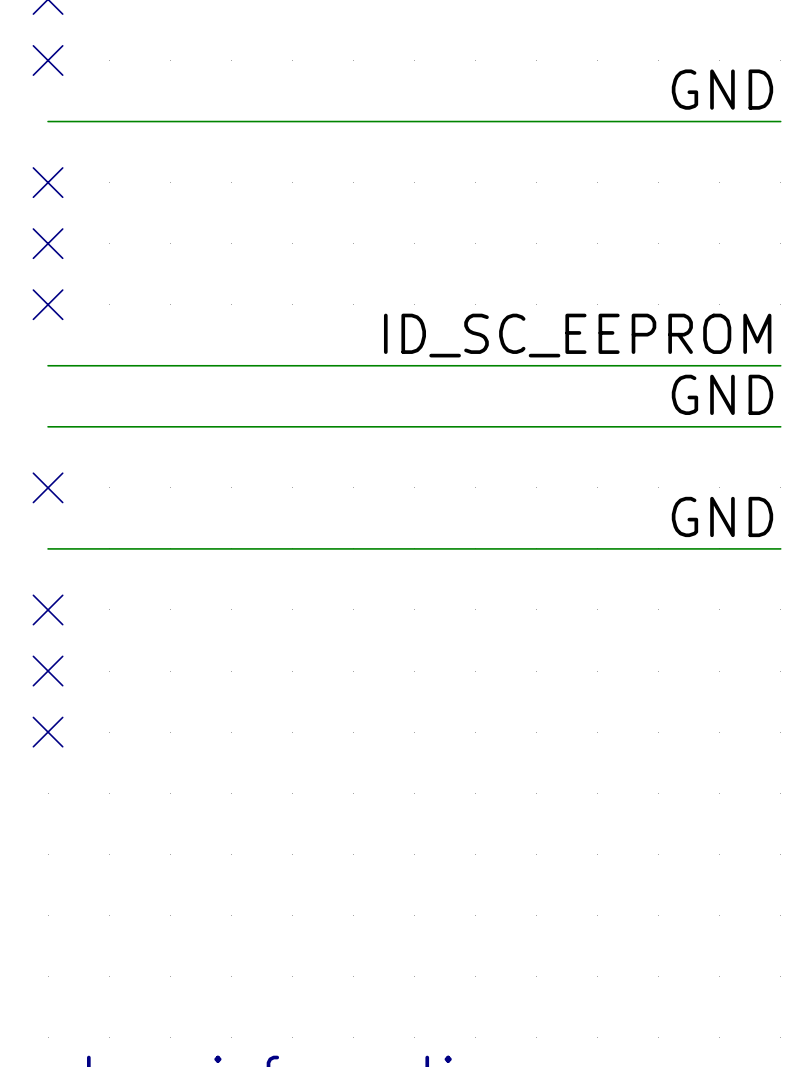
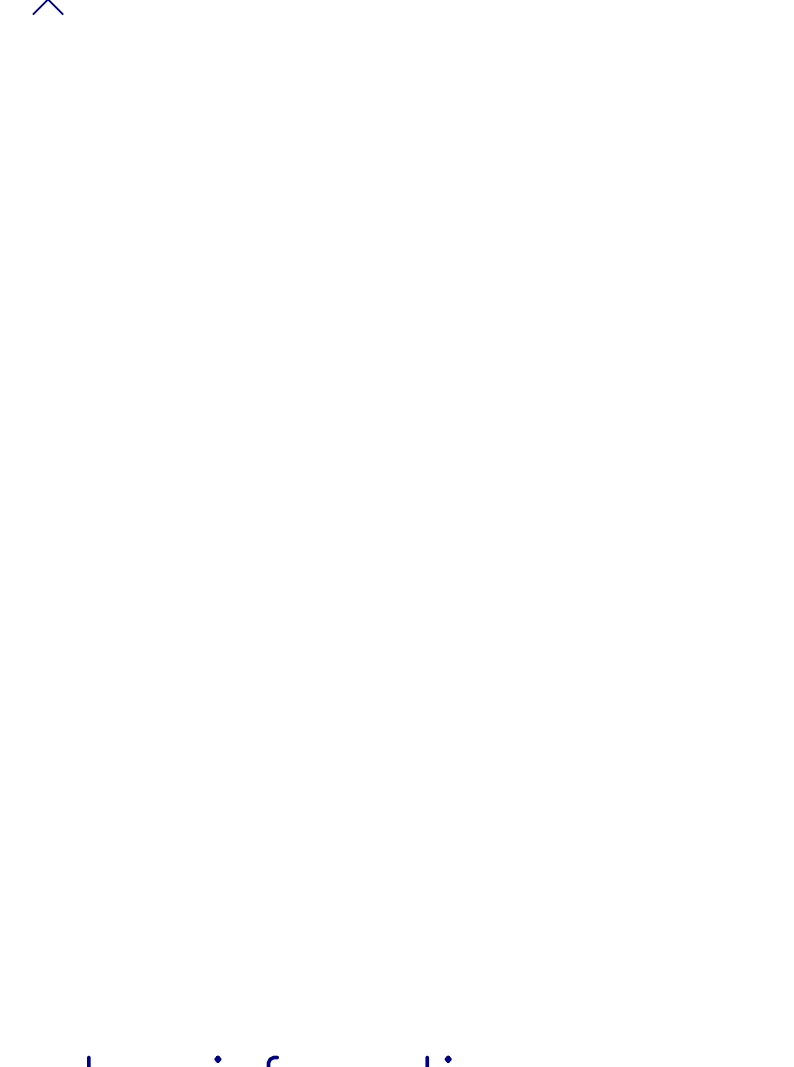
no-connect mark: (48, 60) -> none
label: GND (722, 89) -> none
wire: (48, 121) (780, 121) -> none
no-connect mark: (48, 182) -> none
no-connect mark: (48, 243) -> none
no-connect mark: (48, 304) -> none
label: ID_SC_EEPROM (577, 335) -> none
wire: (48, 365) (780, 365) -> none
label: GND (722, 394) -> none
wire: (48, 426) (780, 426) -> none
no-connect mark: (48, 487) -> none
label: GND (722, 516) -> none
wire: (48, 548) (780, 548) -> none
no-connect mark: (48, 609) -> none
no-connect mark: (48, 671) -> none
no-connect mark: (48, 732) -> none

